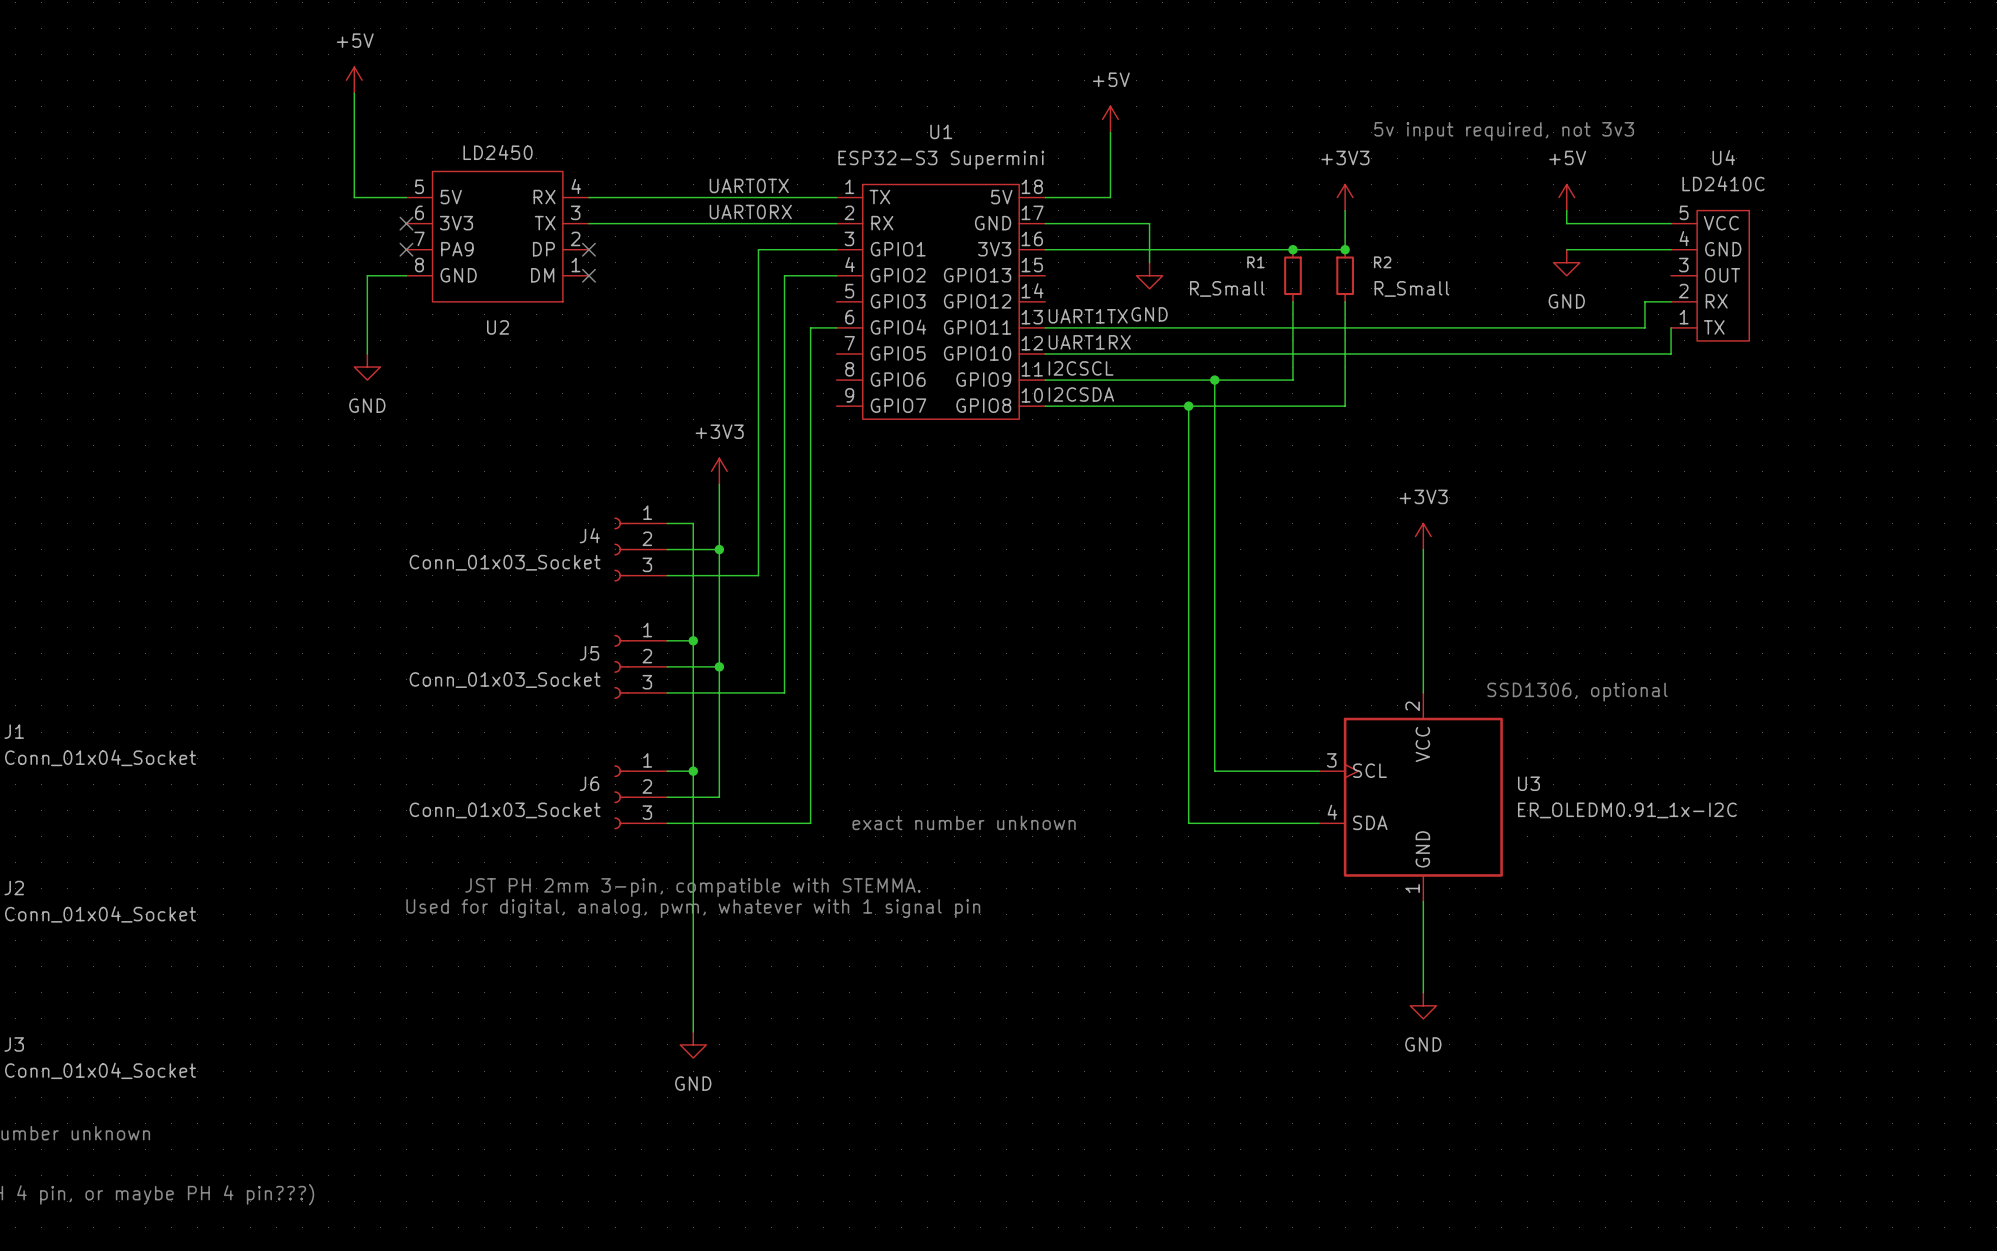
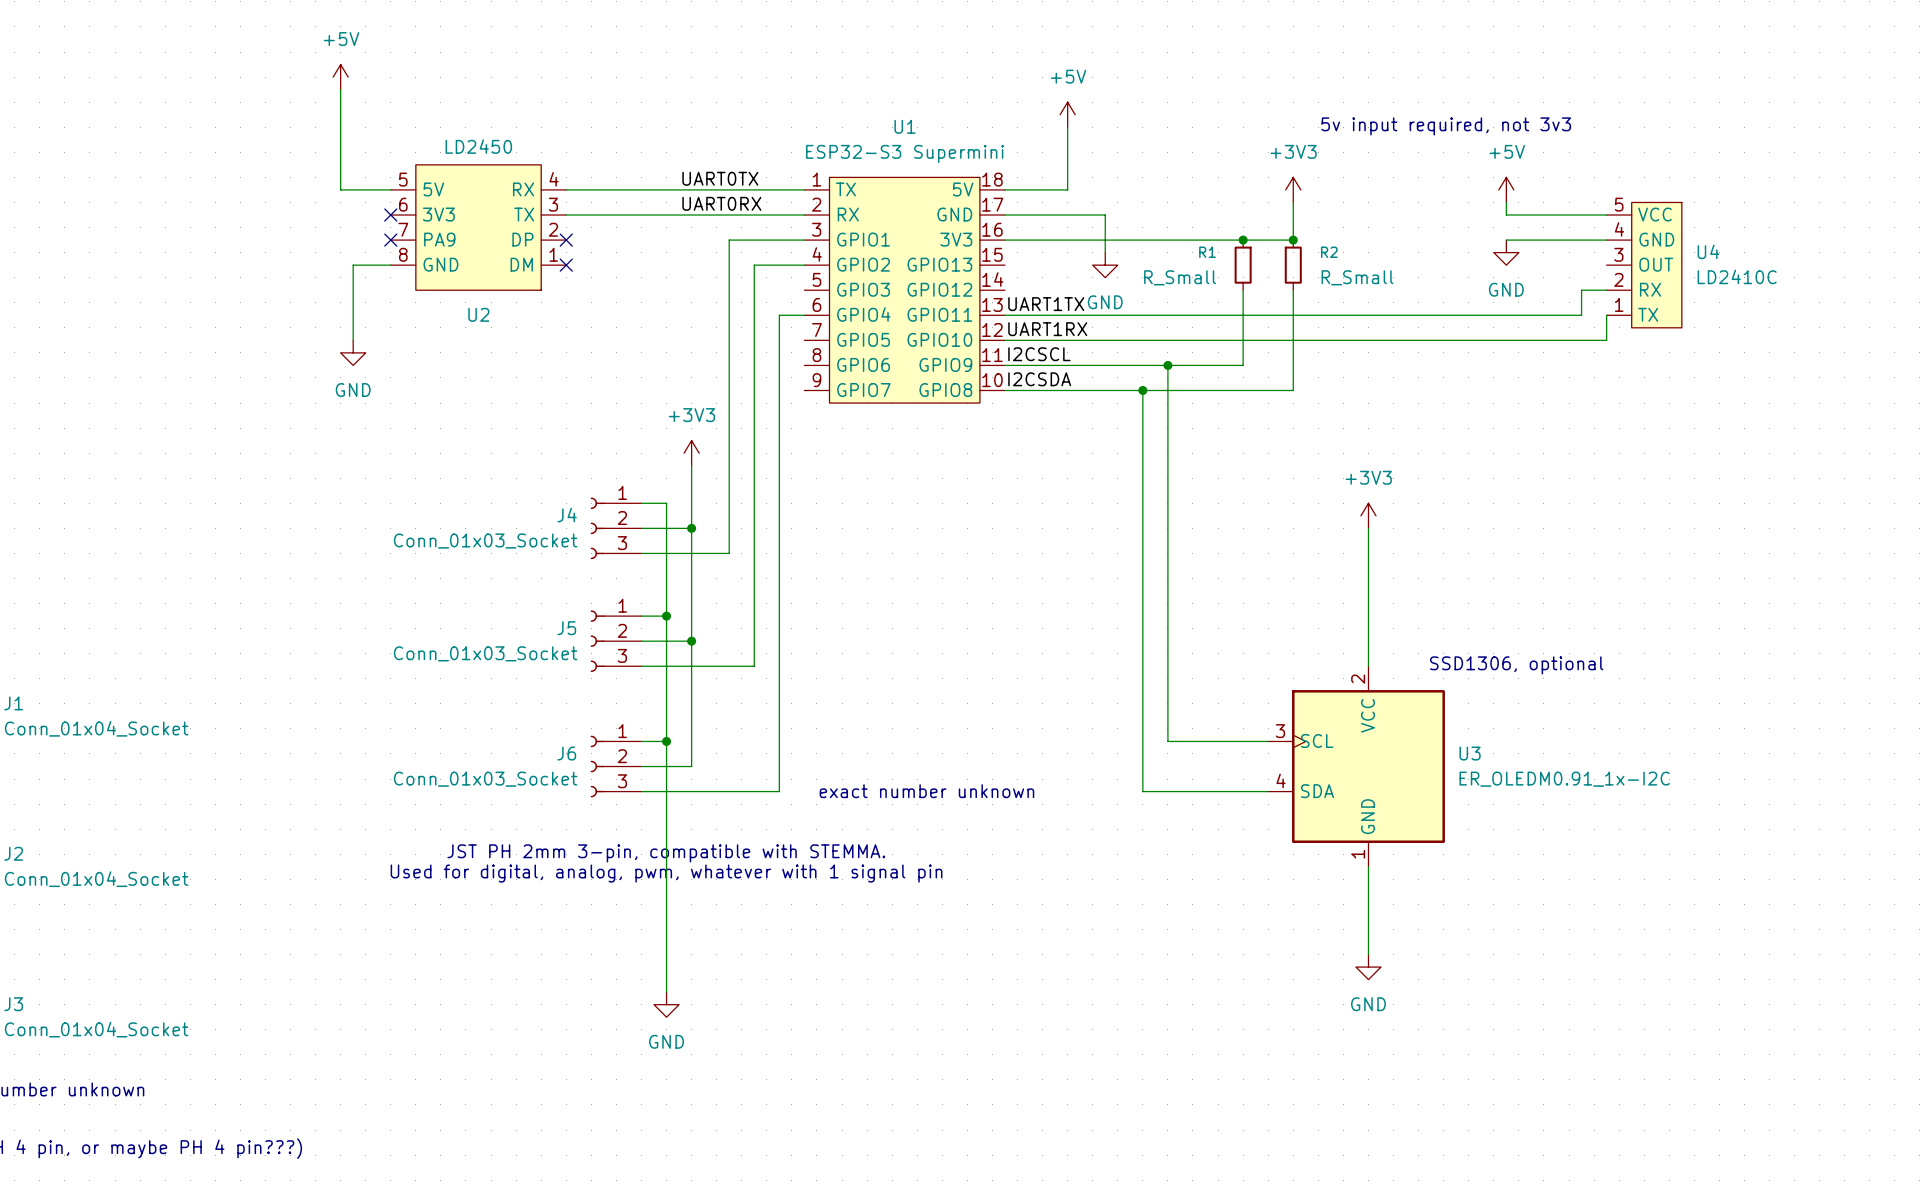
U4 name position: U4 (1723, 157) -> U4 (1708, 251)
U4 value position: LD2410C (1723, 183) -> LD2410C (1737, 276)

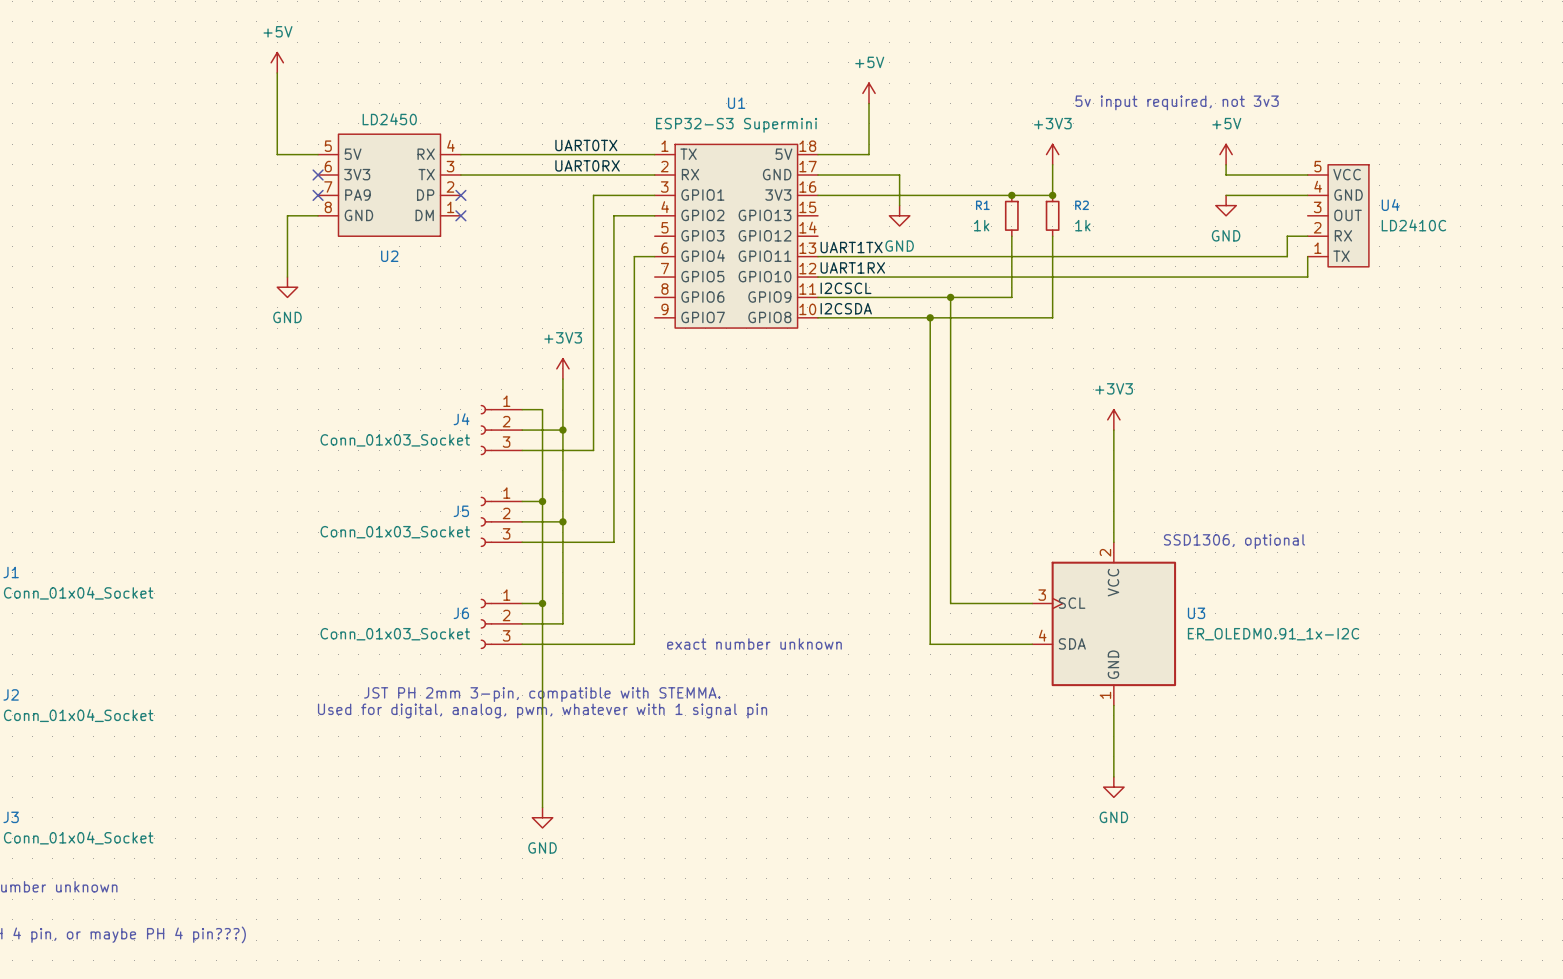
R1 value: R_Small (1180, 277) -> 1k (981, 225)
R2 value: R_Small (1357, 277) -> 1k (1082, 225)

